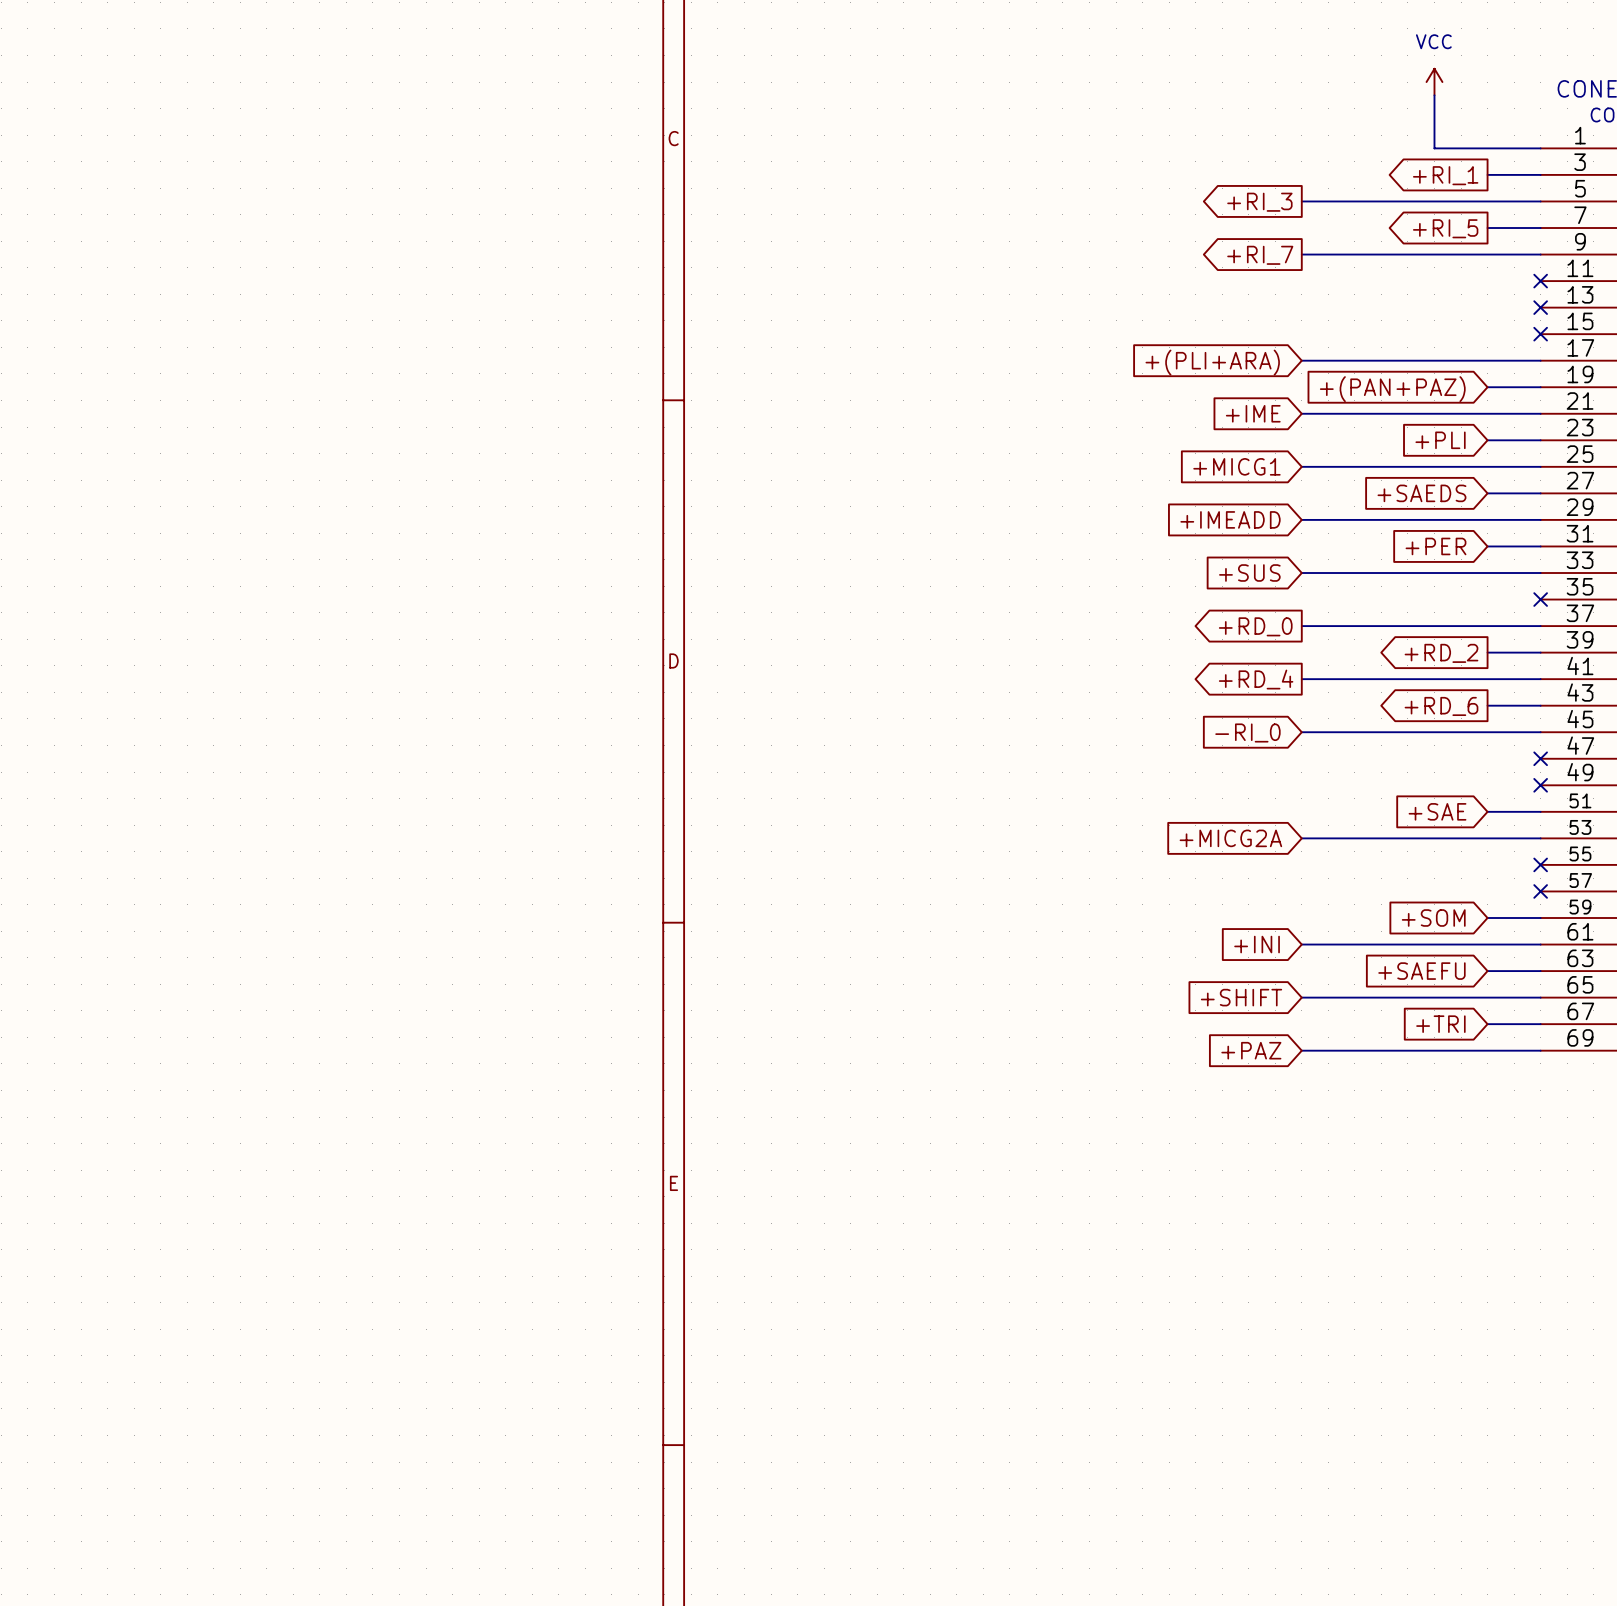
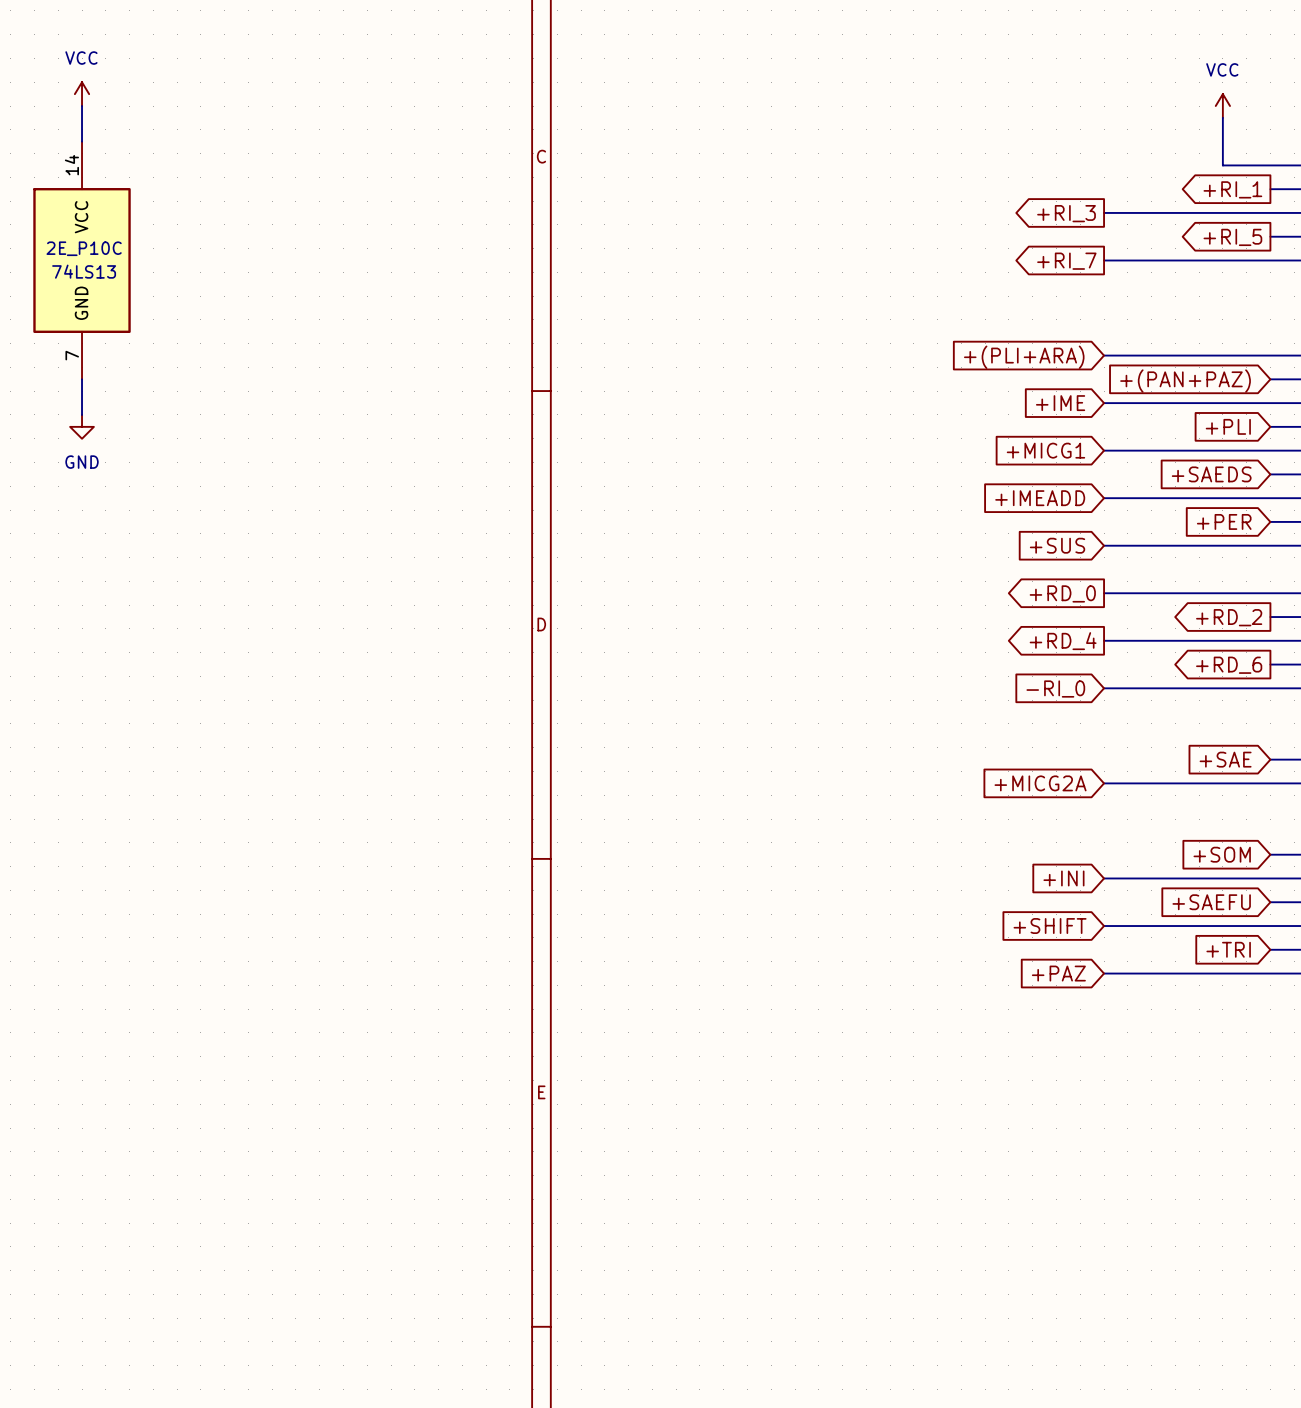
power symbol: none -> VCC (82, 94)
wire: none -> (82, 106) (82, 141)
2E_P10C: none -> 74LS13 (82, 260)
wire: none -> (82, 379) (82, 414)
power symbol: none -> GND (82, 426)

